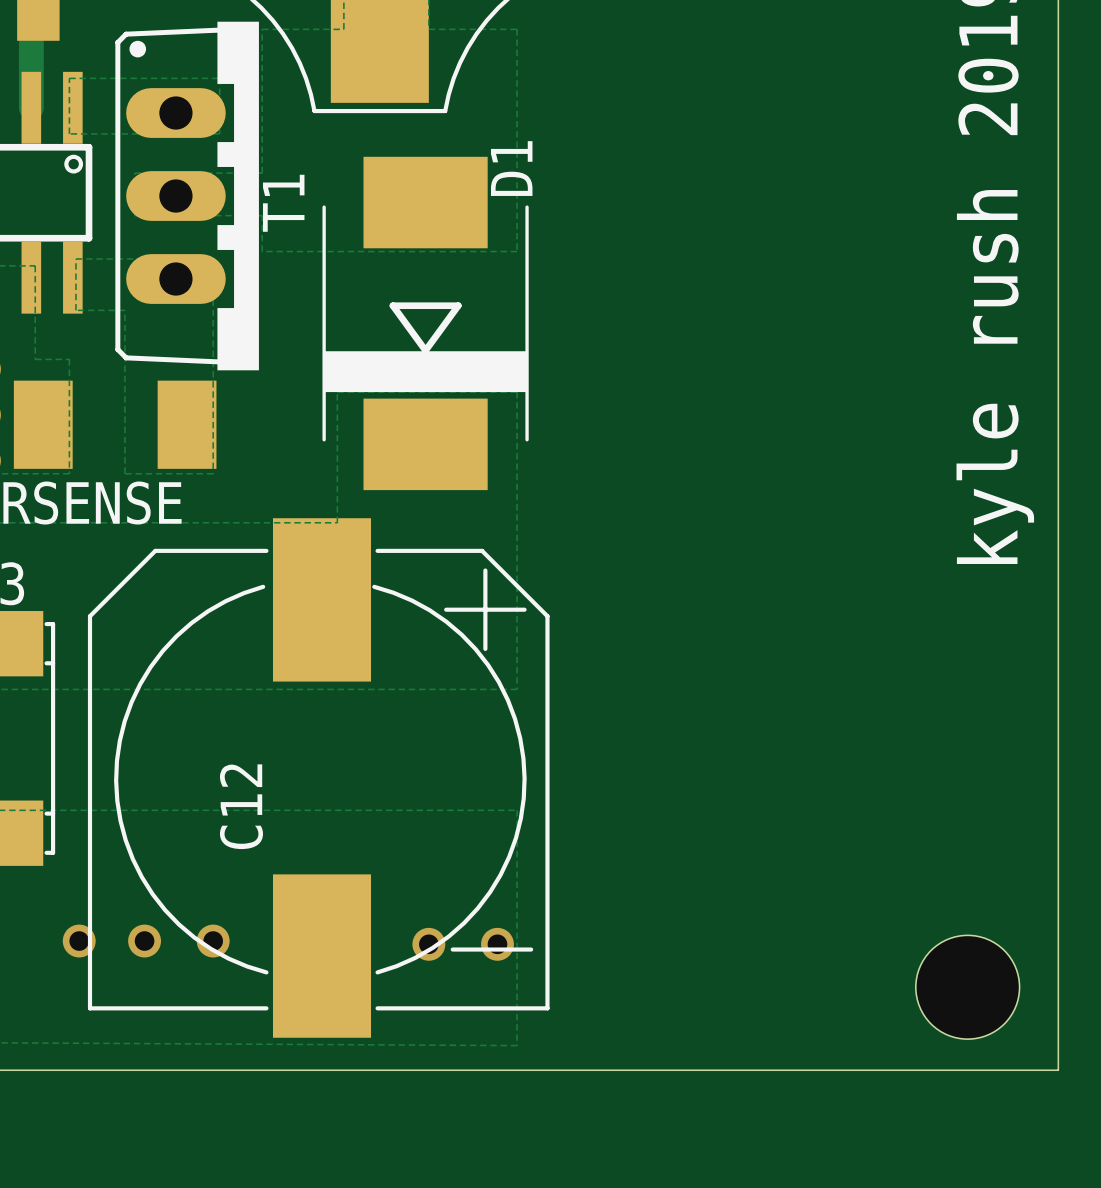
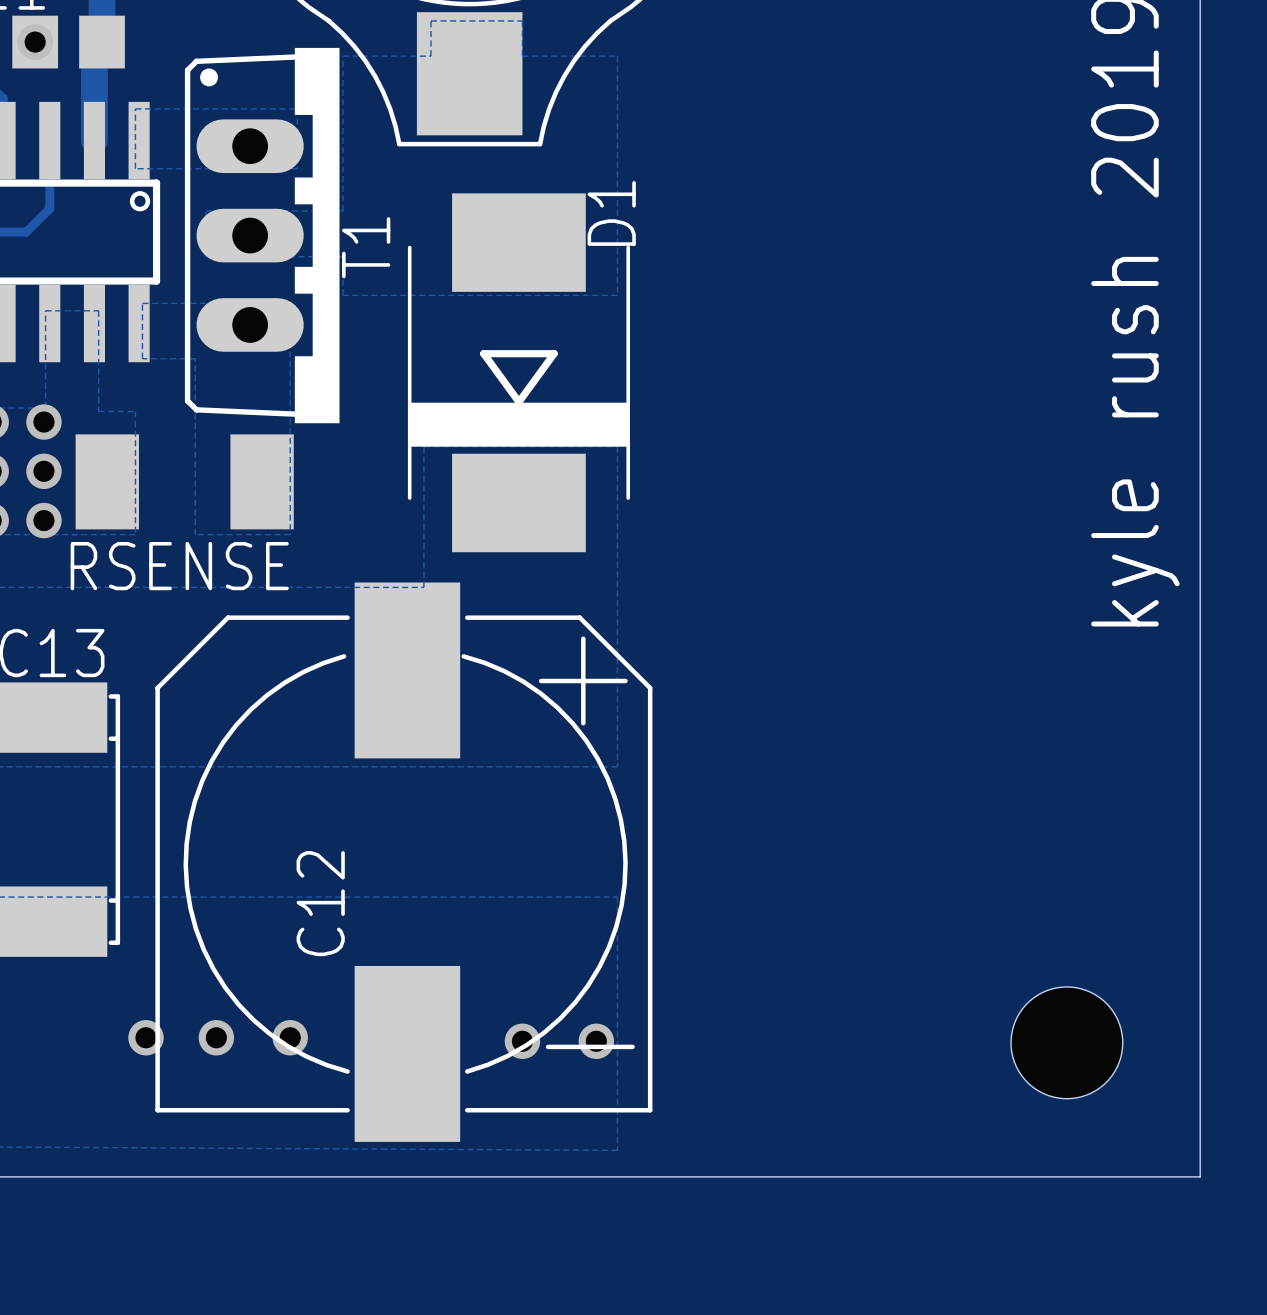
hole position: (967, 987) -> (1066, 1042)

